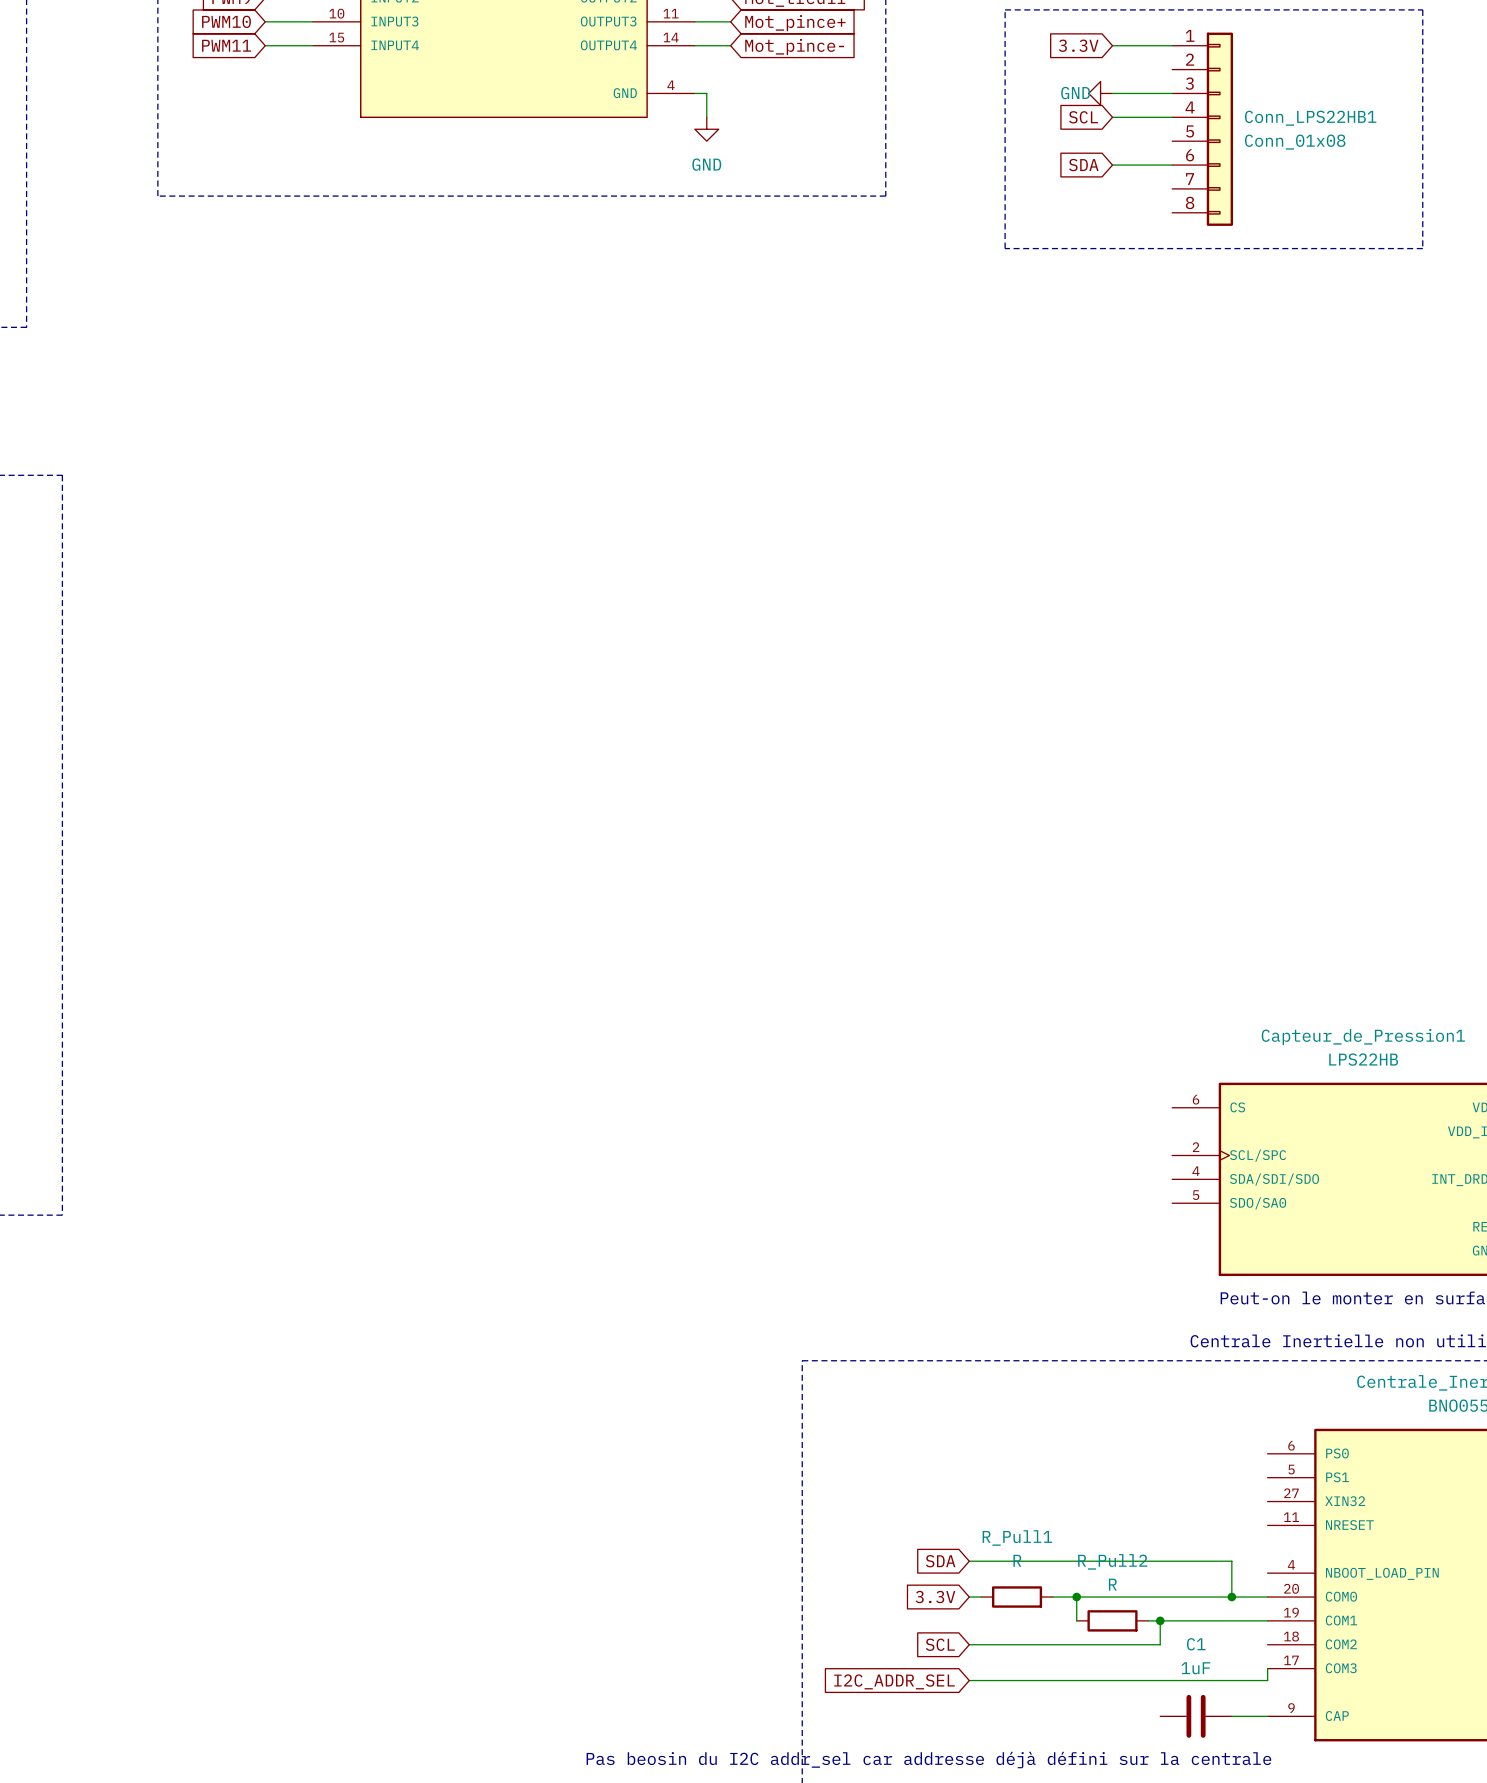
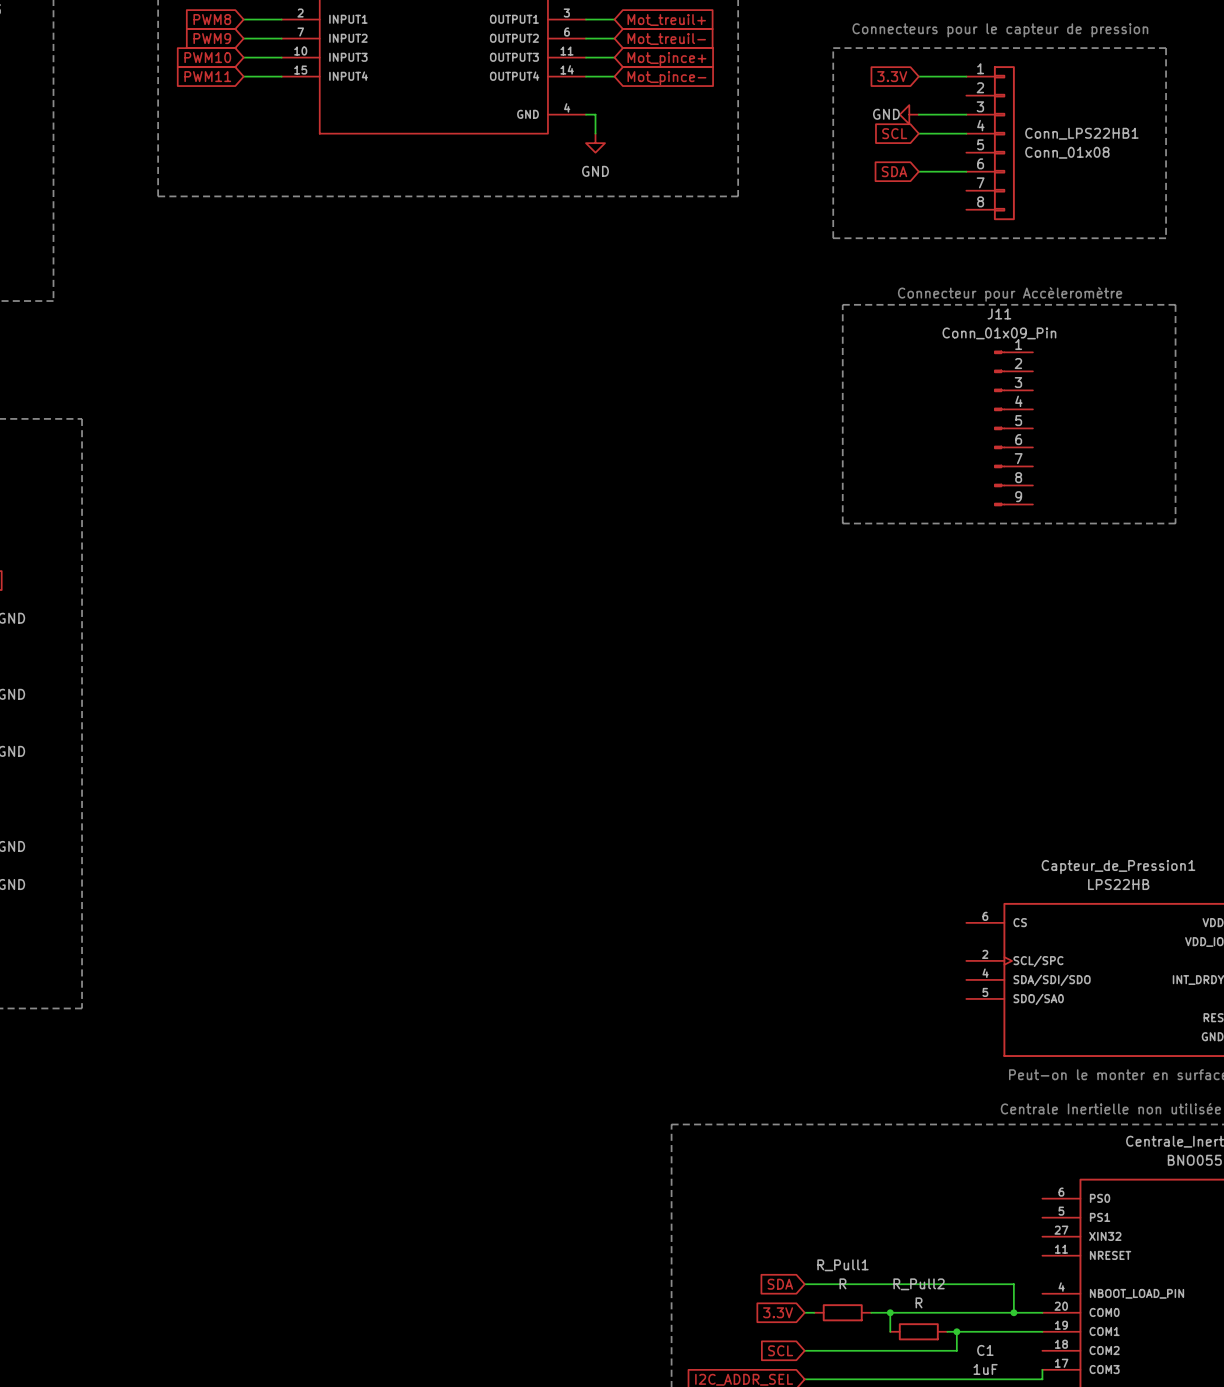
text: none -> Connecteur pour Accèleromètre (1010, 294)
line: none -> (842, 304) (1175, 304) (1175, 523) (842, 523) (842, 304)
J11: none -> Conn_01x09_Pin (1013, 428)

